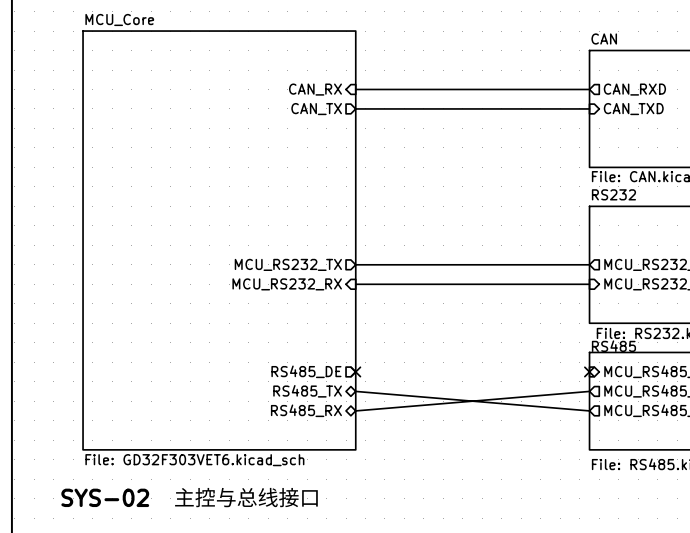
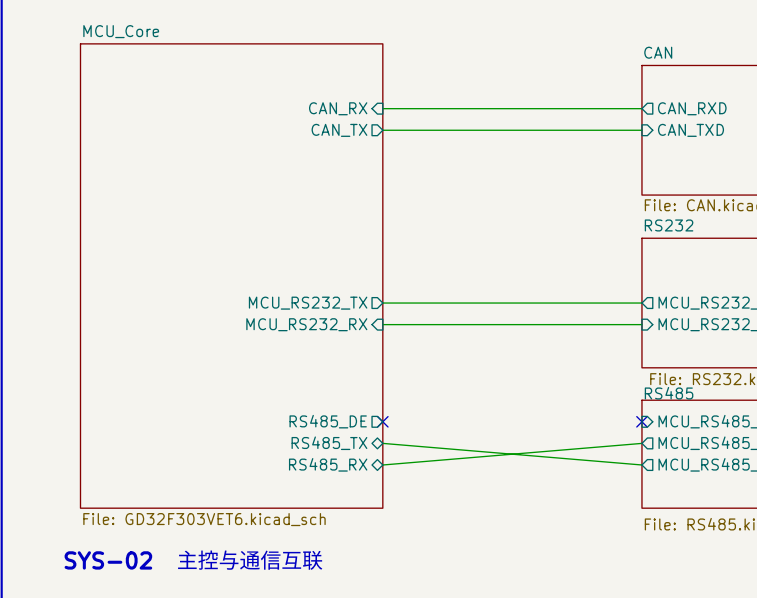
text: SYS-02 主控与总线接口 (190, 497) -> SYS-02 主控与通信互联 (194, 560)

